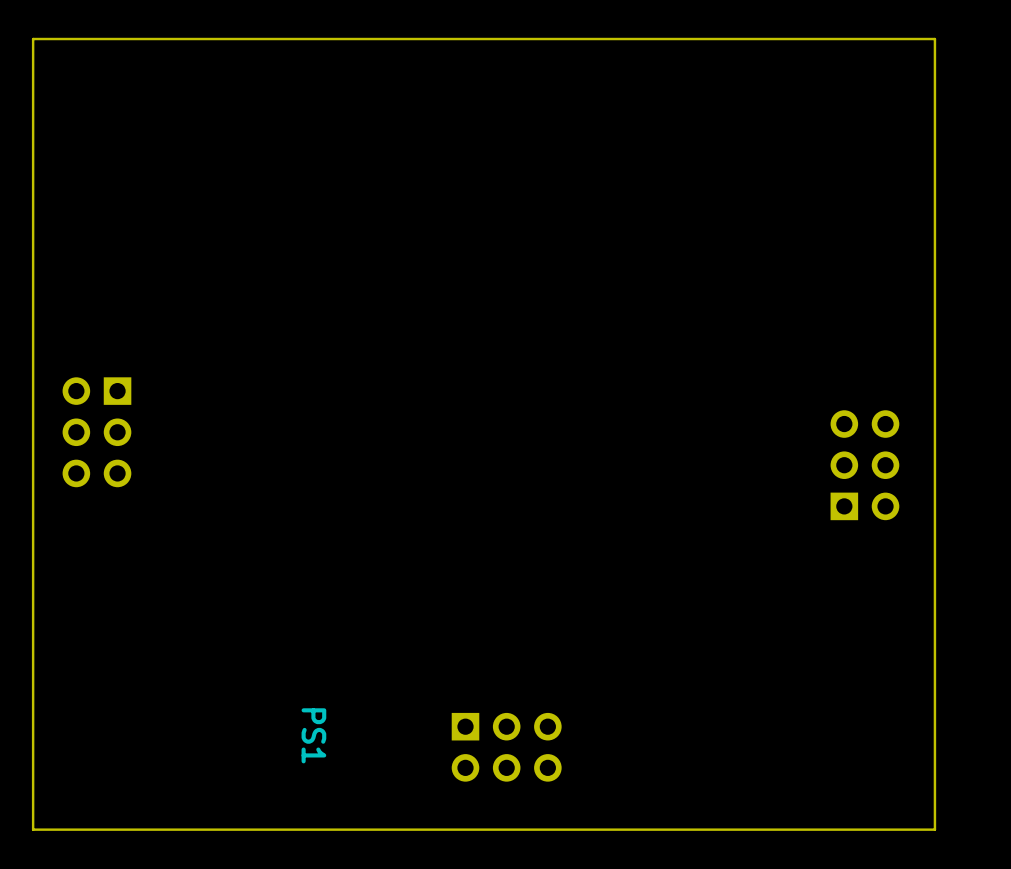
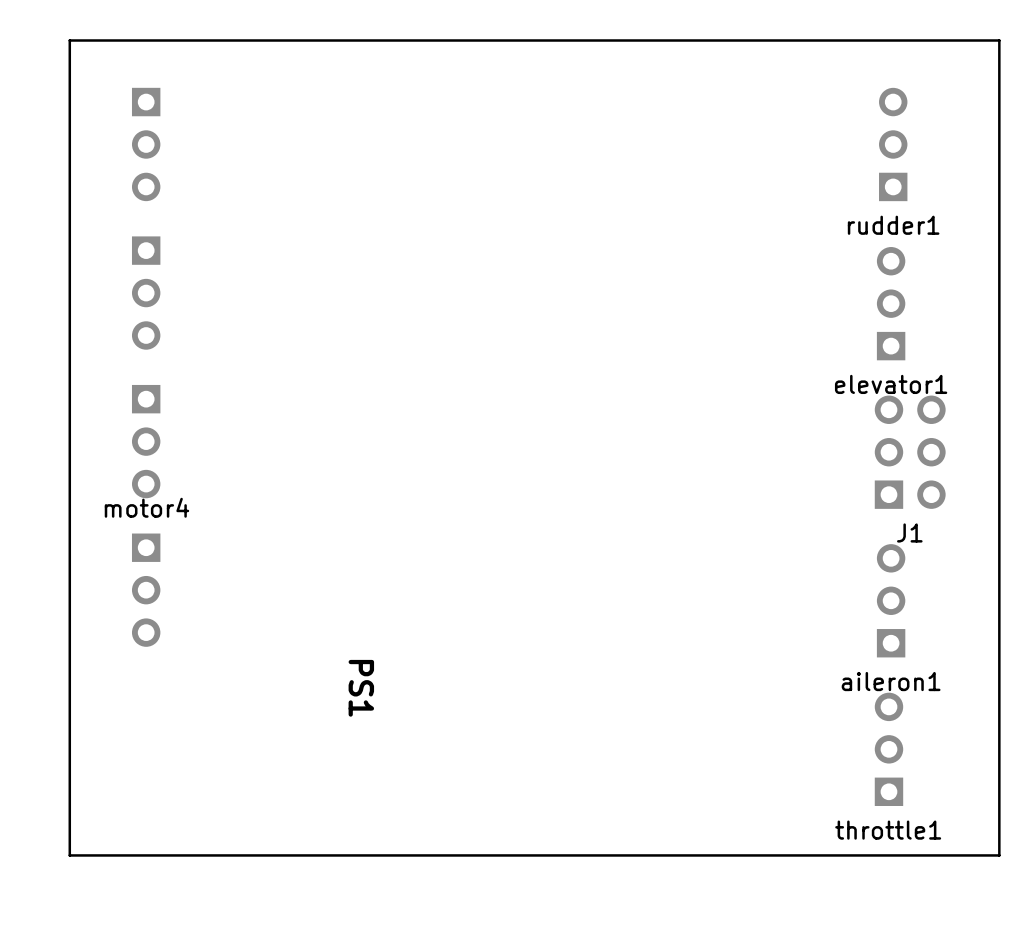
part: none -> (146, 144)
rudder1: none -> (893, 144)
part: none -> (146, 293)
elevator1: none -> (891, 303)
part footprint: [62, 377, 132, 488] -> [131, 384, 161, 499]
J1: none -> (910, 452)
part: (864, 465) -> none
motor4: none -> (146, 590)
aileron1: none -> (891, 600)
throttle1: none -> (888, 749)
PS1 position: (313, 735) -> (361, 688)
part: (506, 747) -> none

